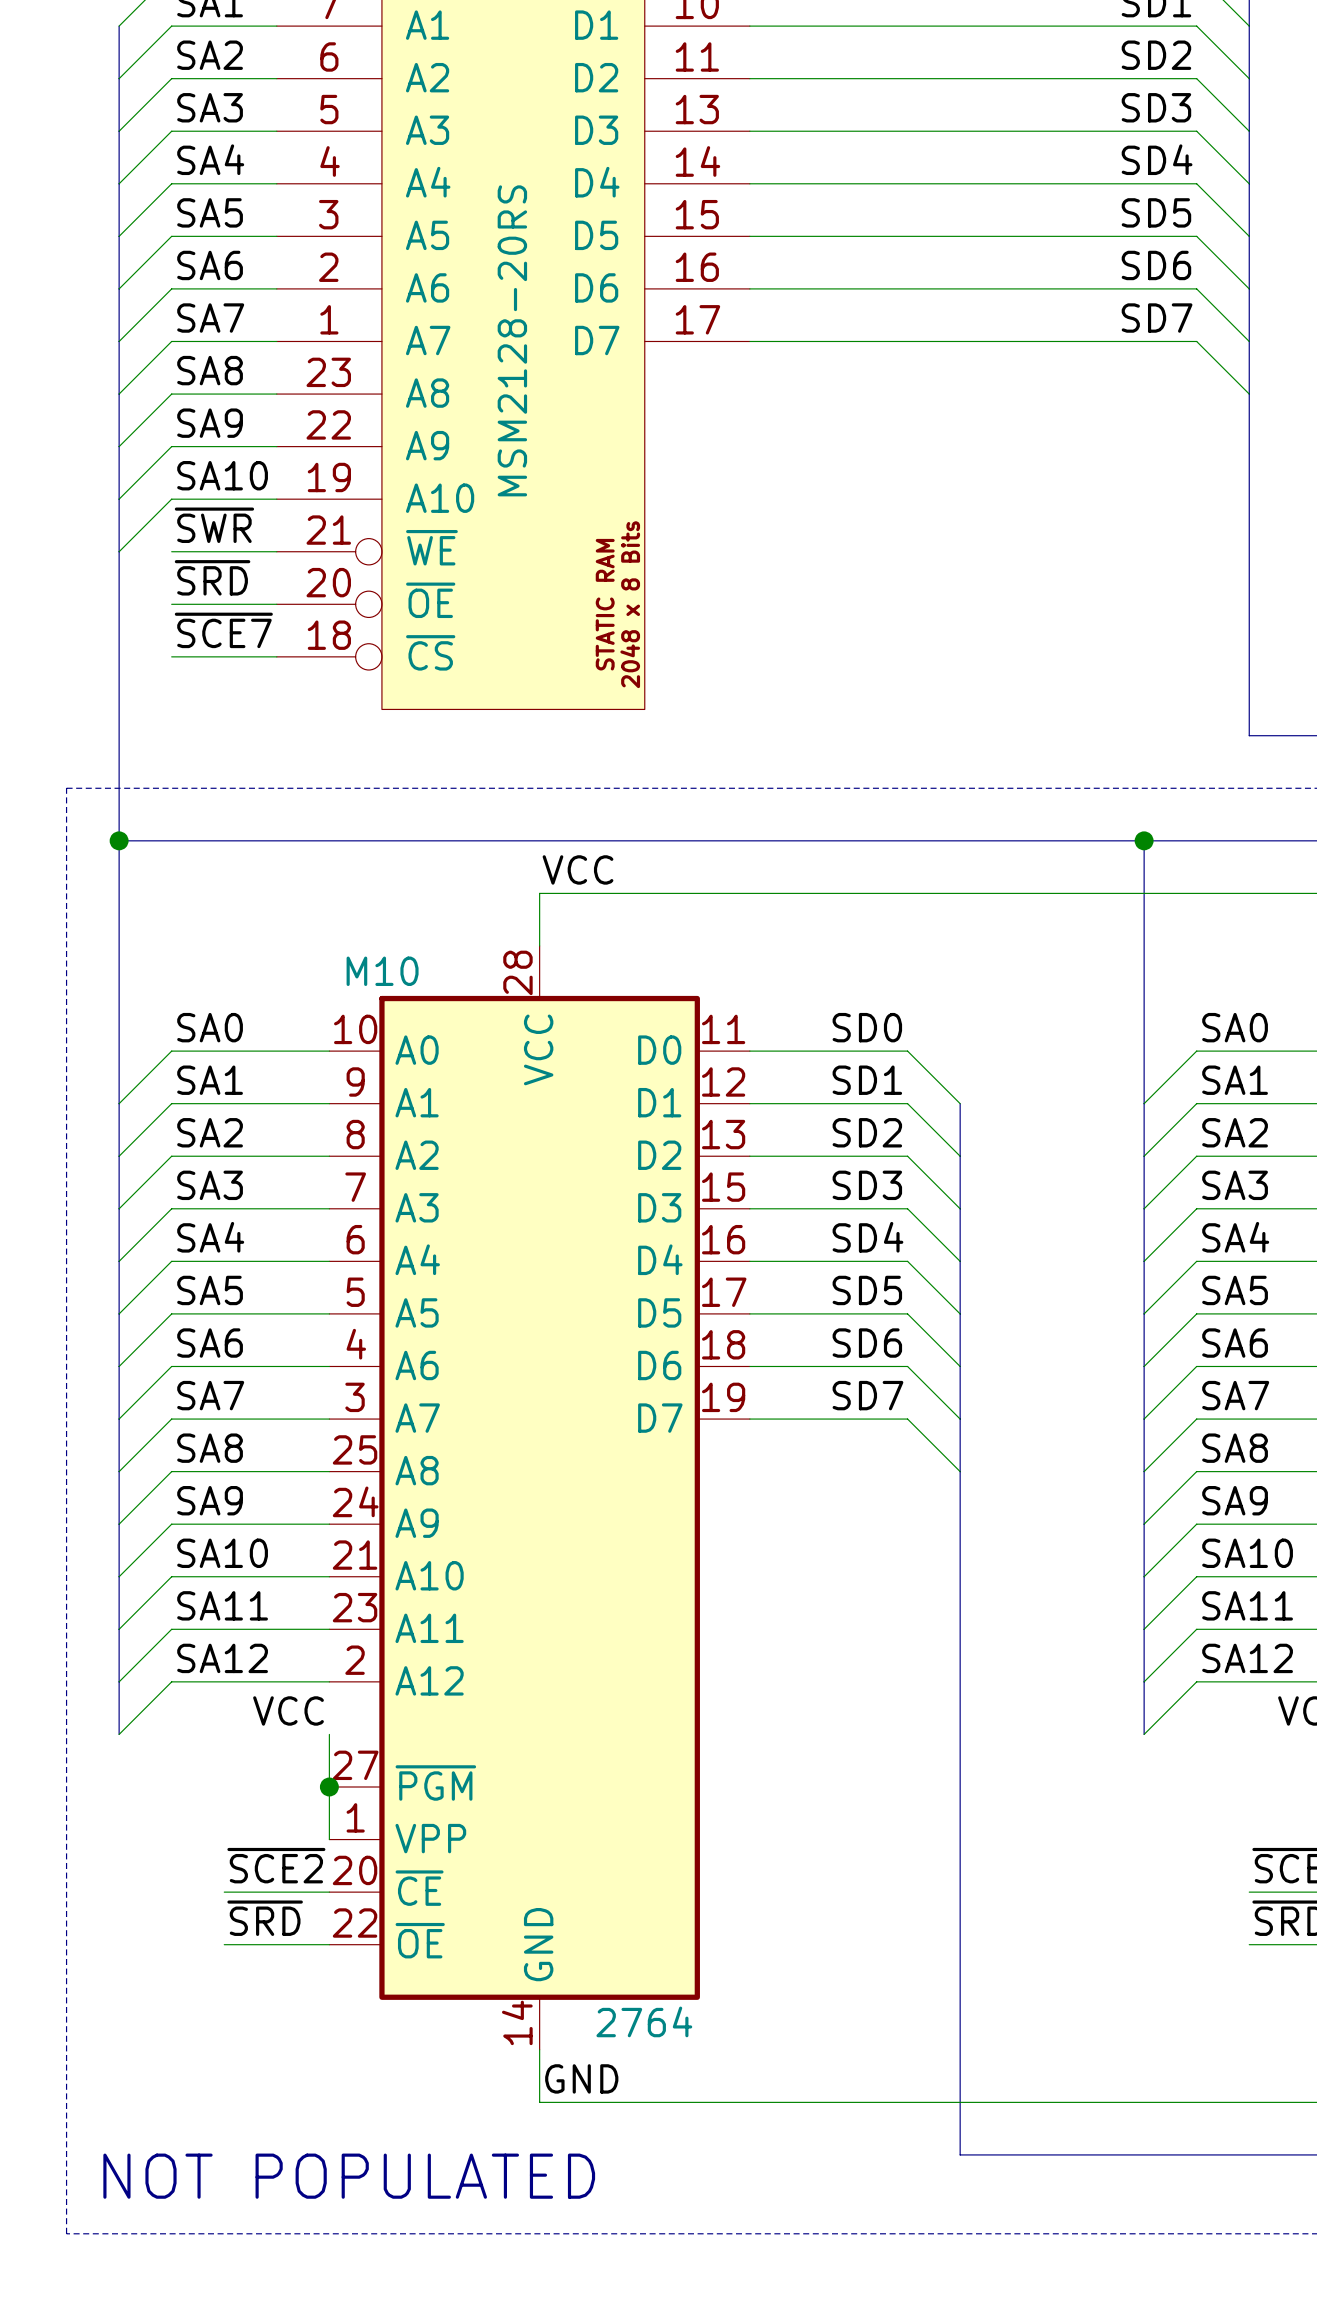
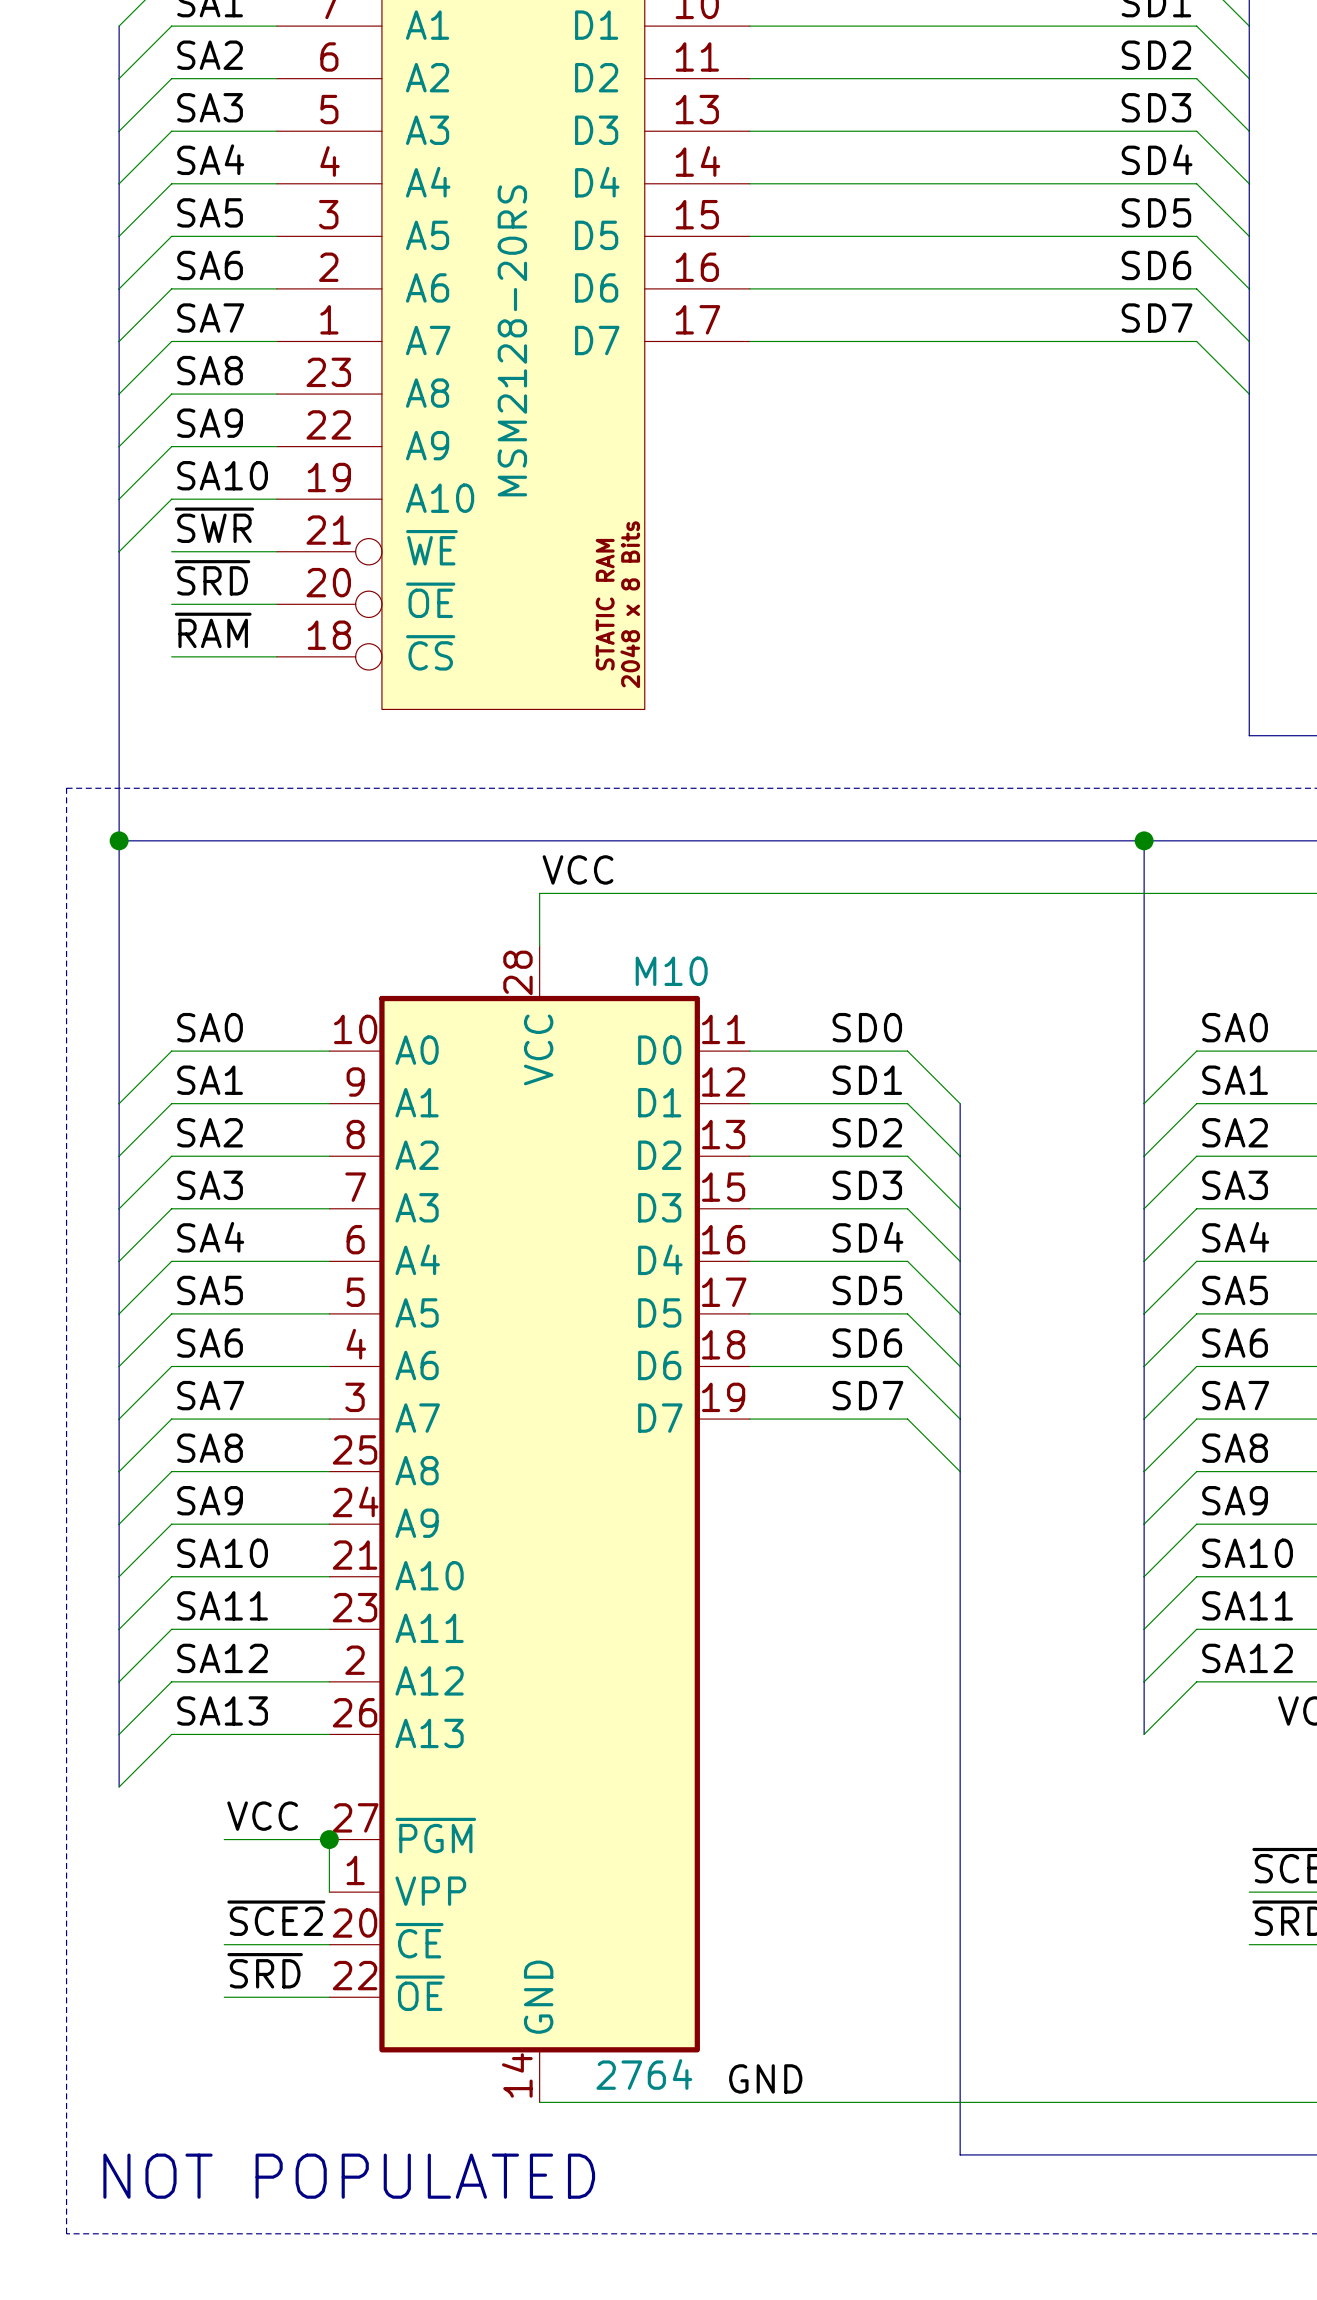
label: ~{SCE7} (223, 630) -> ~{RAM} (213, 630)
M10 symbol: [329, 945, 750, 2050] -> [329, 945, 750, 2103]
M10 name position: M10 (382, 971) -> M10 (671, 971)
label: none -> SA13 (222, 1710)
label position: VCC (288, 1710) -> VCC (262, 1816)
bus: none -> (119, 1734) (119, 1787)
wire: (329, 1734) (329, 1839) -> (329, 1734) (171, 1734) (119, 1787)
junction position: (329, 1787) -> (329, 1839)
label: ~{SCE2} (276, 1865) -> none
wire: (224, 1892) (329, 1892) -> (224, 1839) (329, 1839) (329, 1892)
label: ~{SRD} (265, 1918) -> ~{SCE2} (276, 1918)
label: none -> ~{SRD} (265, 1970)
wire: none -> (224, 1997) (329, 1997)
label position: GND (581, 2078) -> GND (765, 2078)

